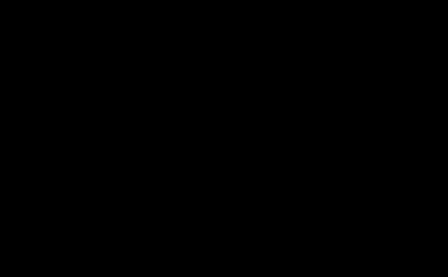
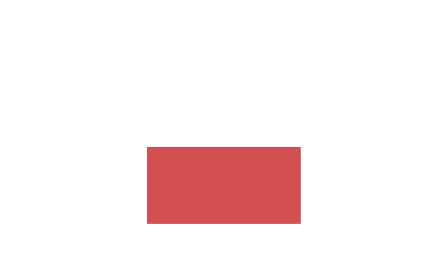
part: none -> (223, 185)

